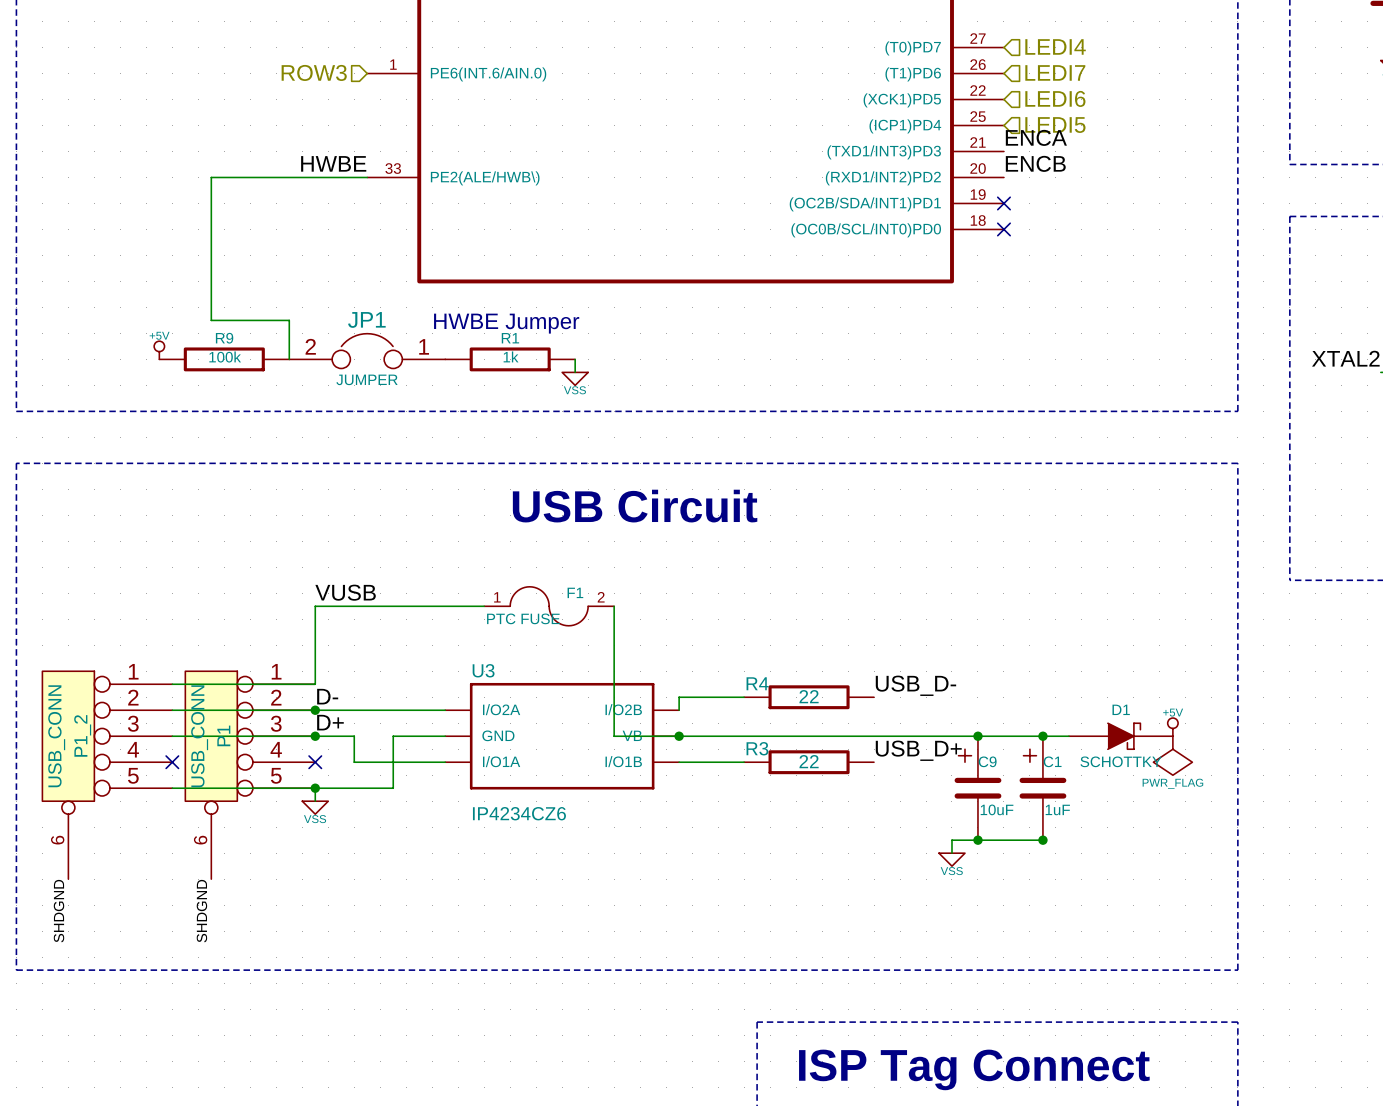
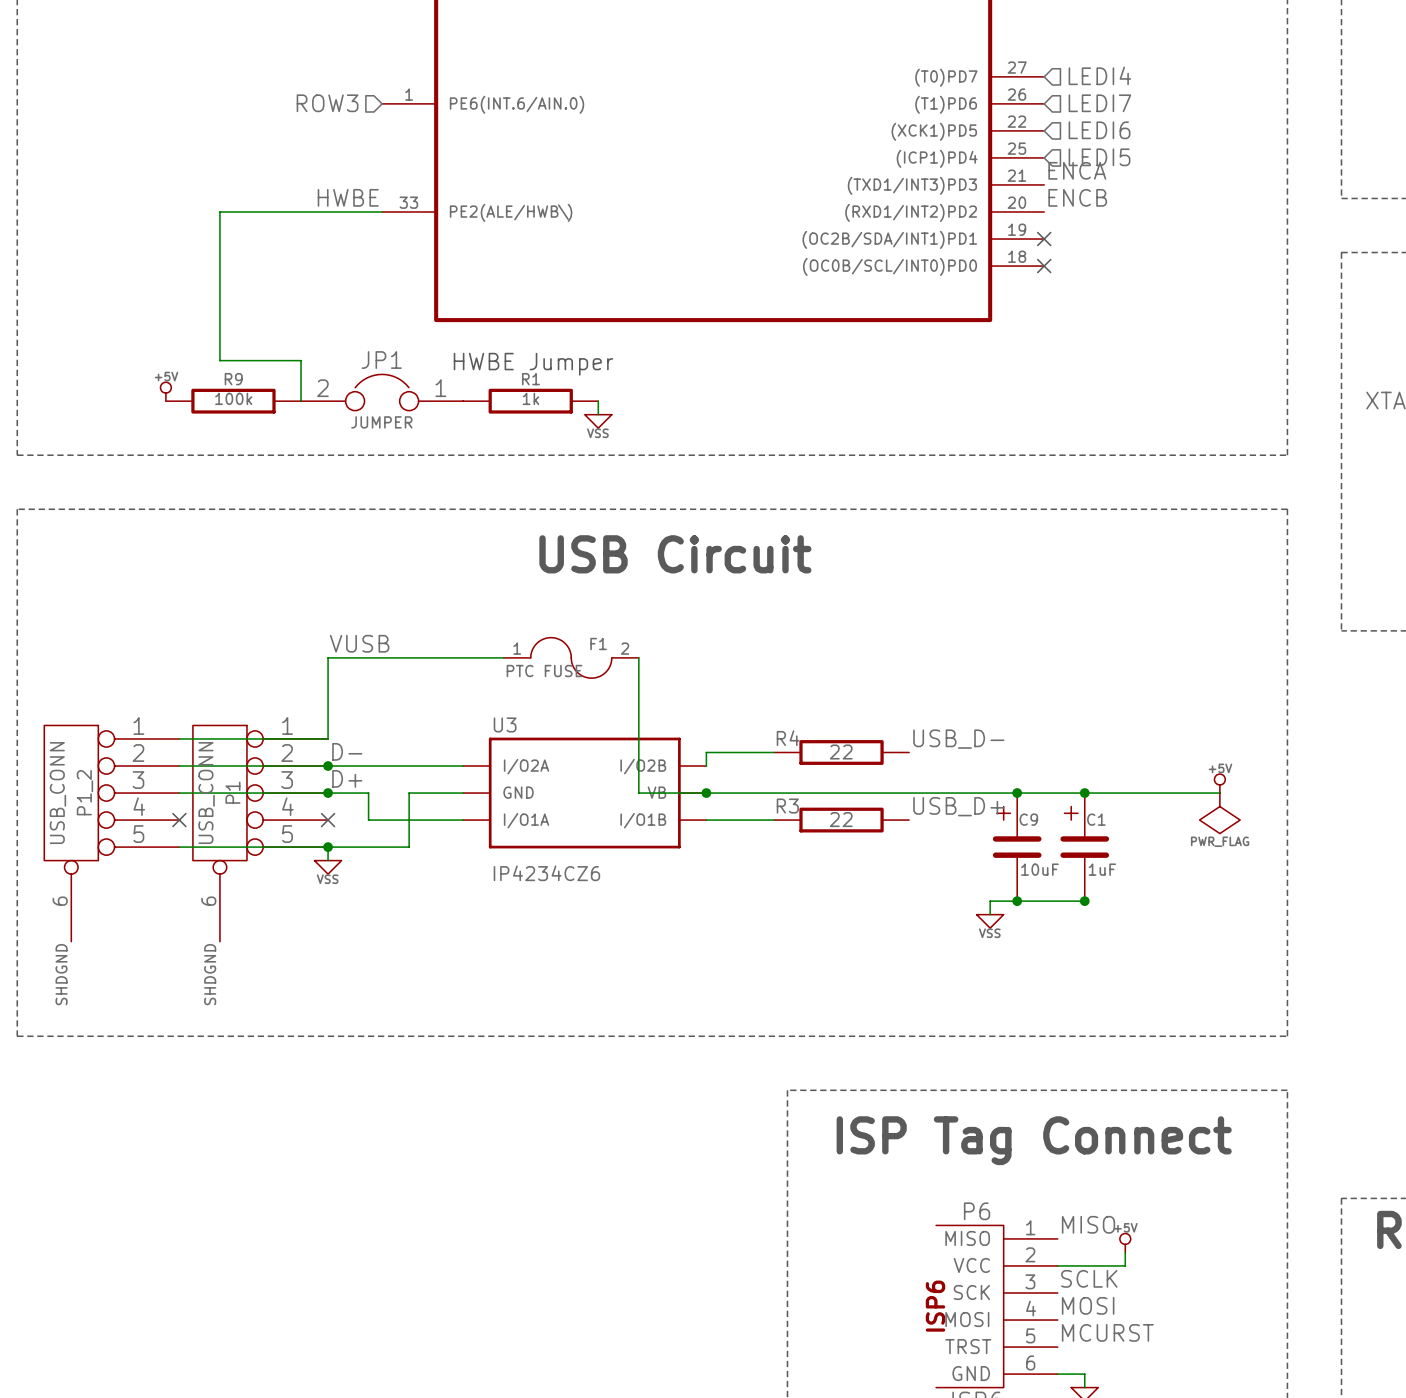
D1: SCHOTTKY (1120, 736) -> none

